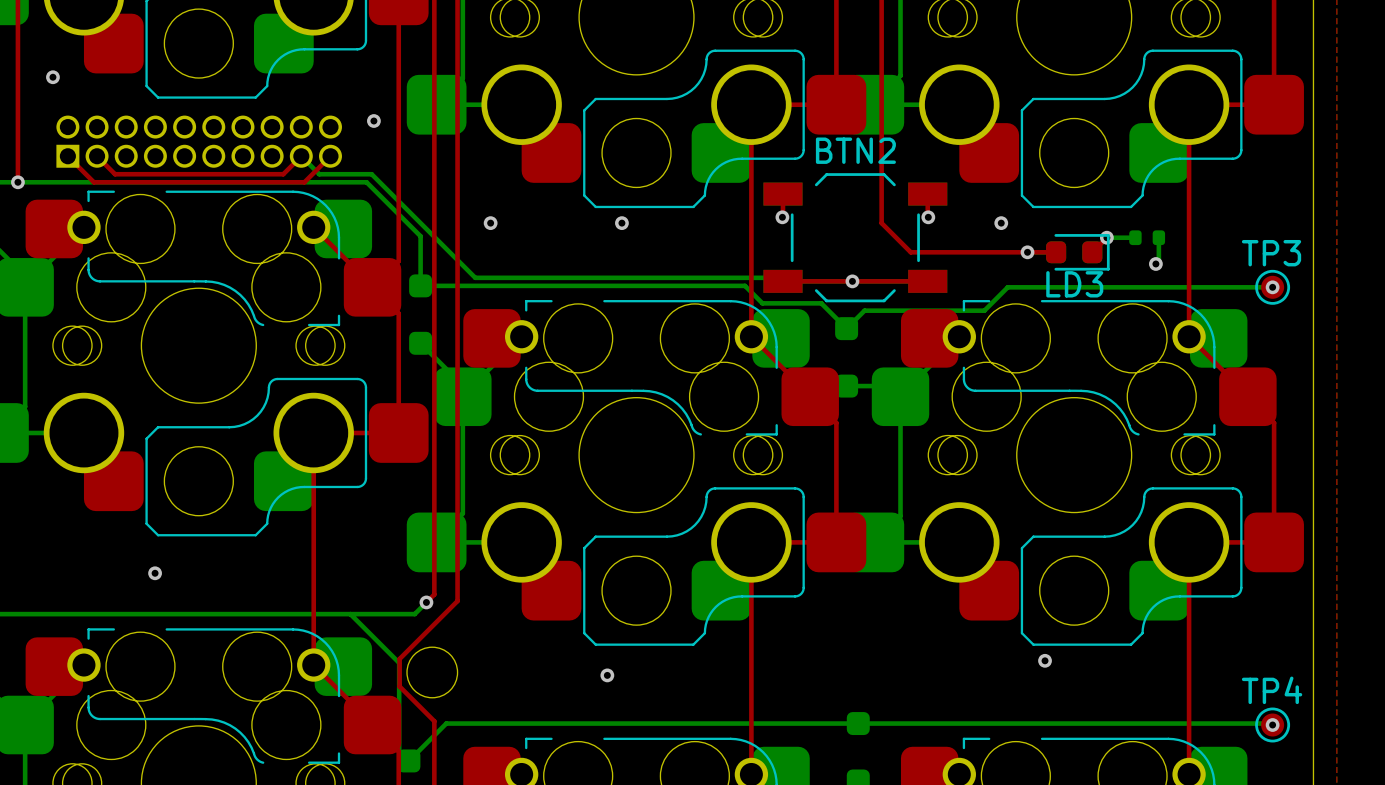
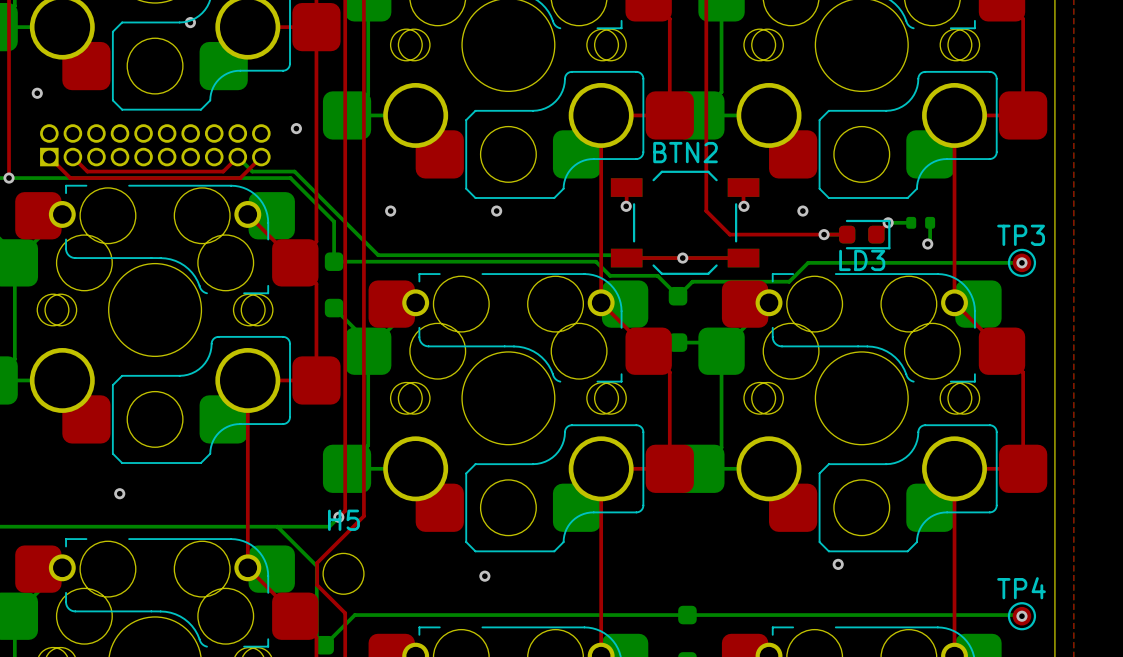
H5 name: none -> H5 (343, 520)

